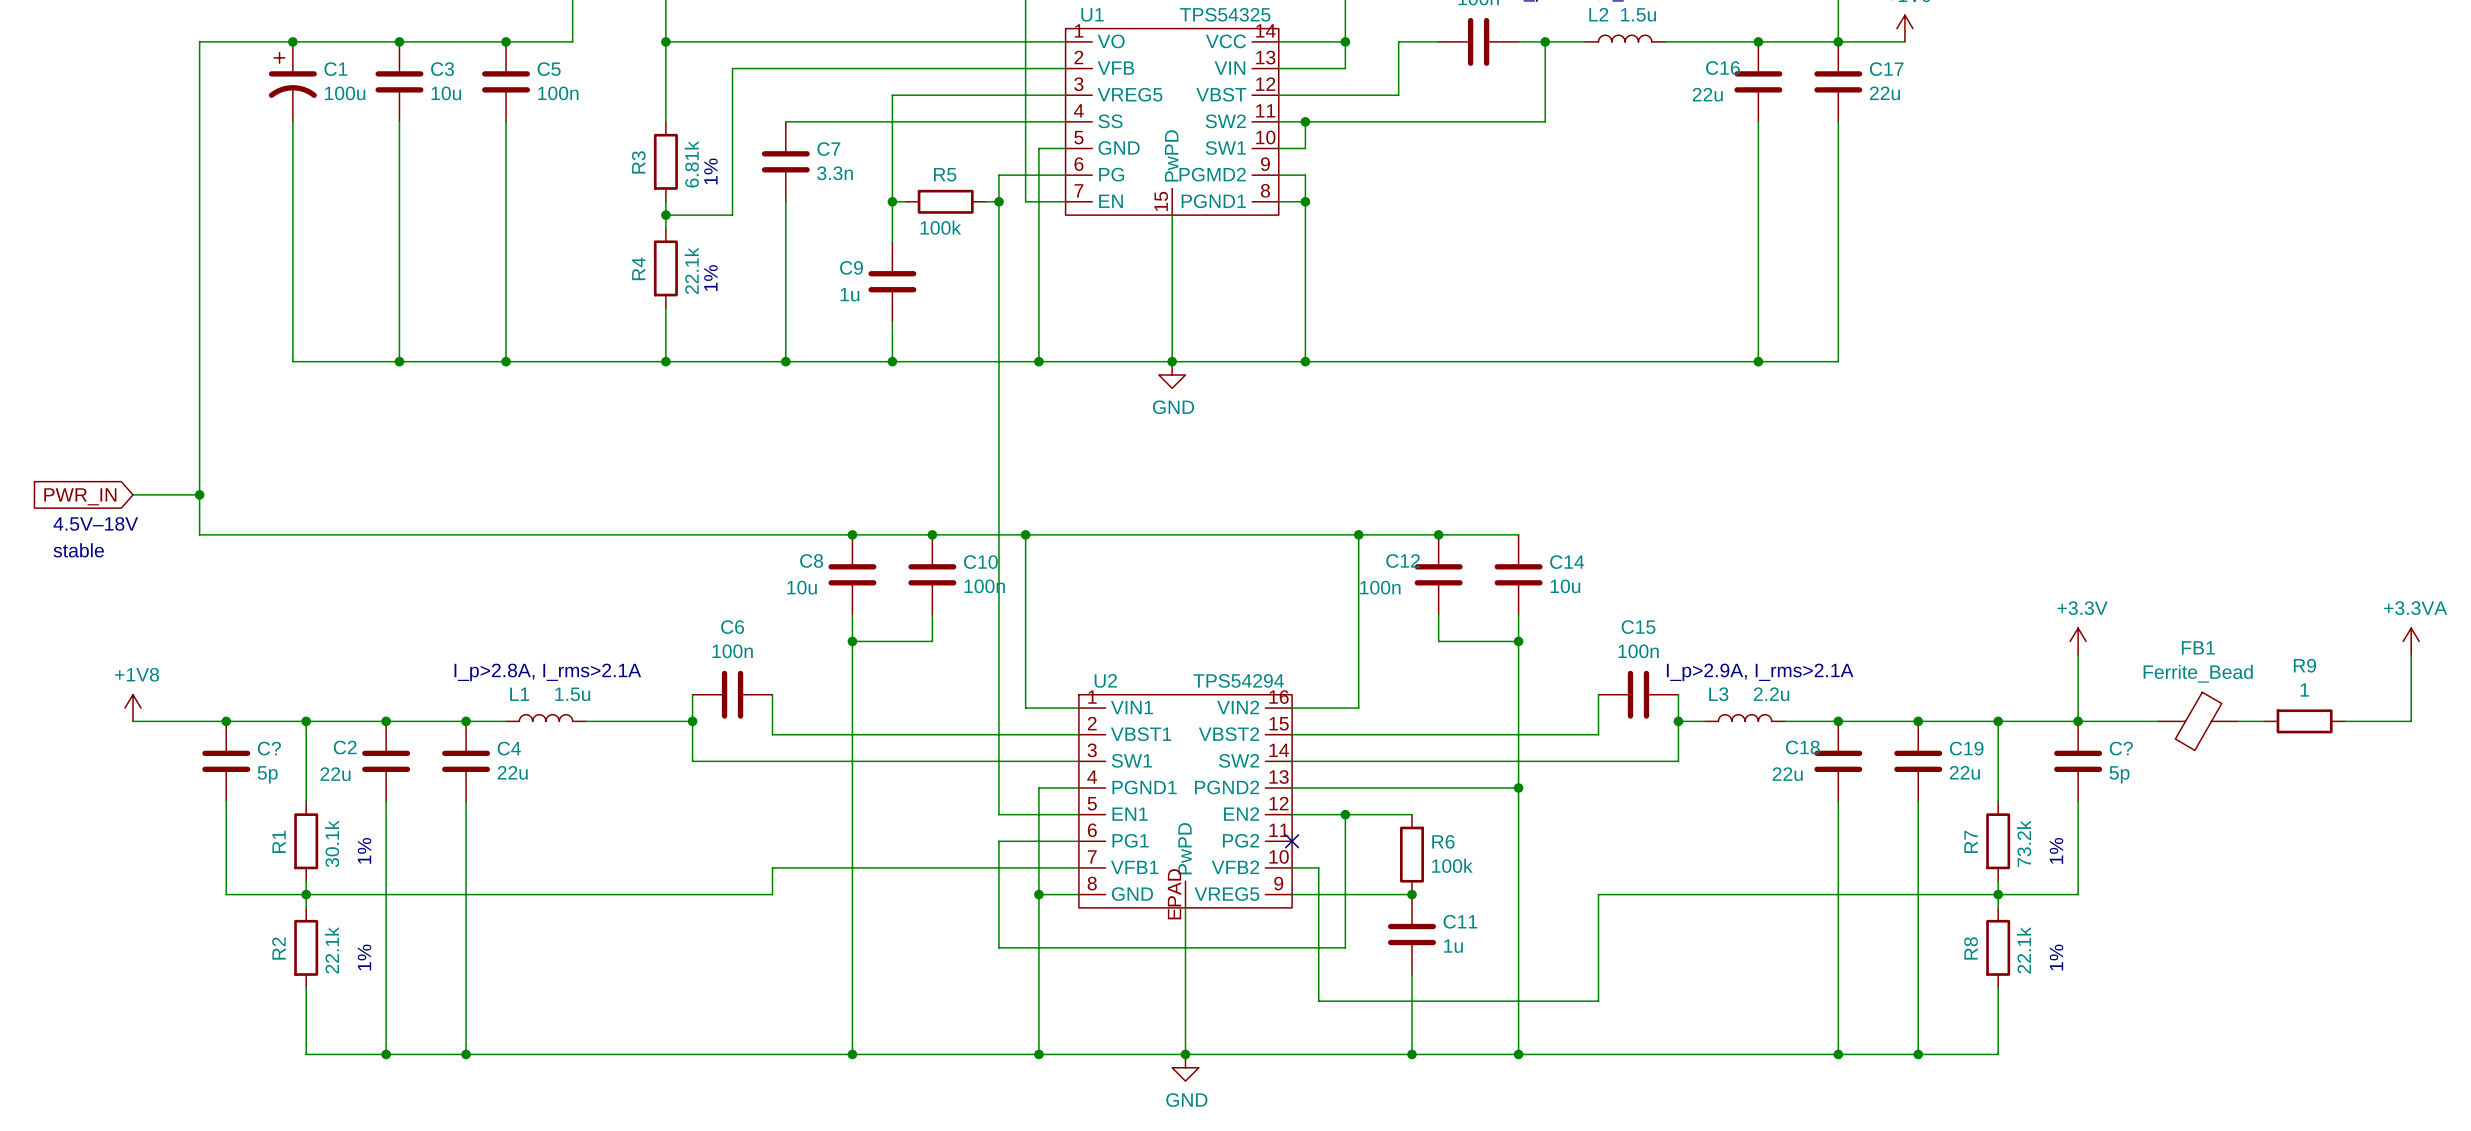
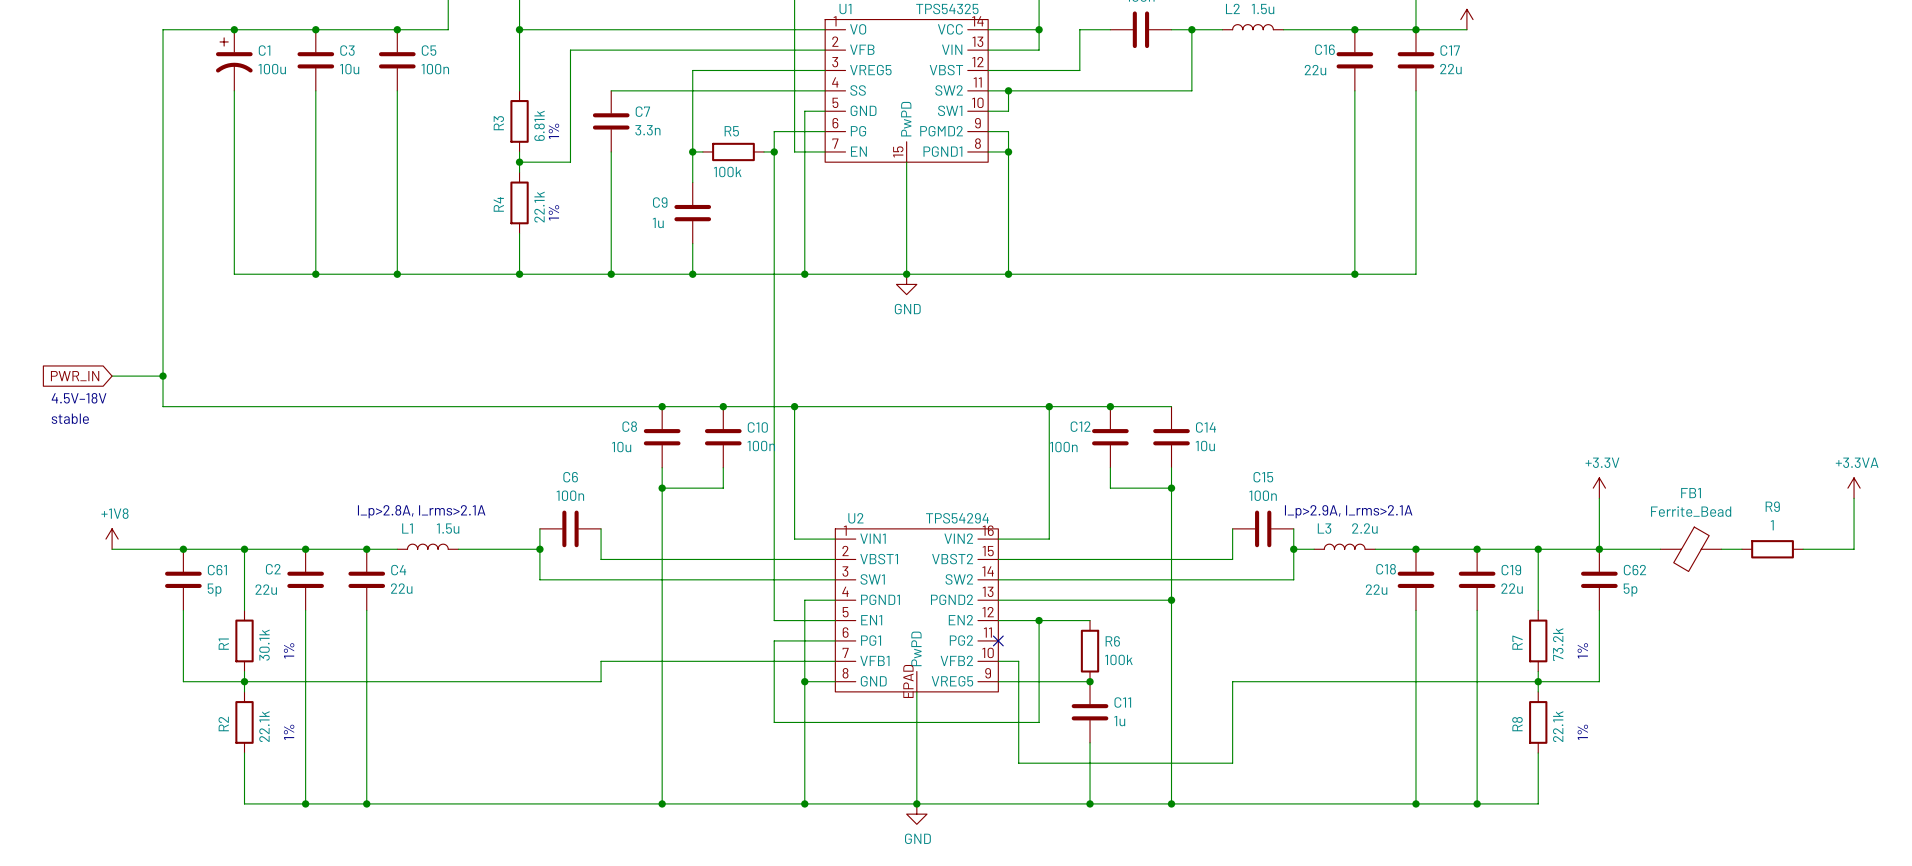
C? name: C? (269, 748) -> C61 (217, 570)
C? name: C? (2121, 748) -> C62 (1634, 570)

